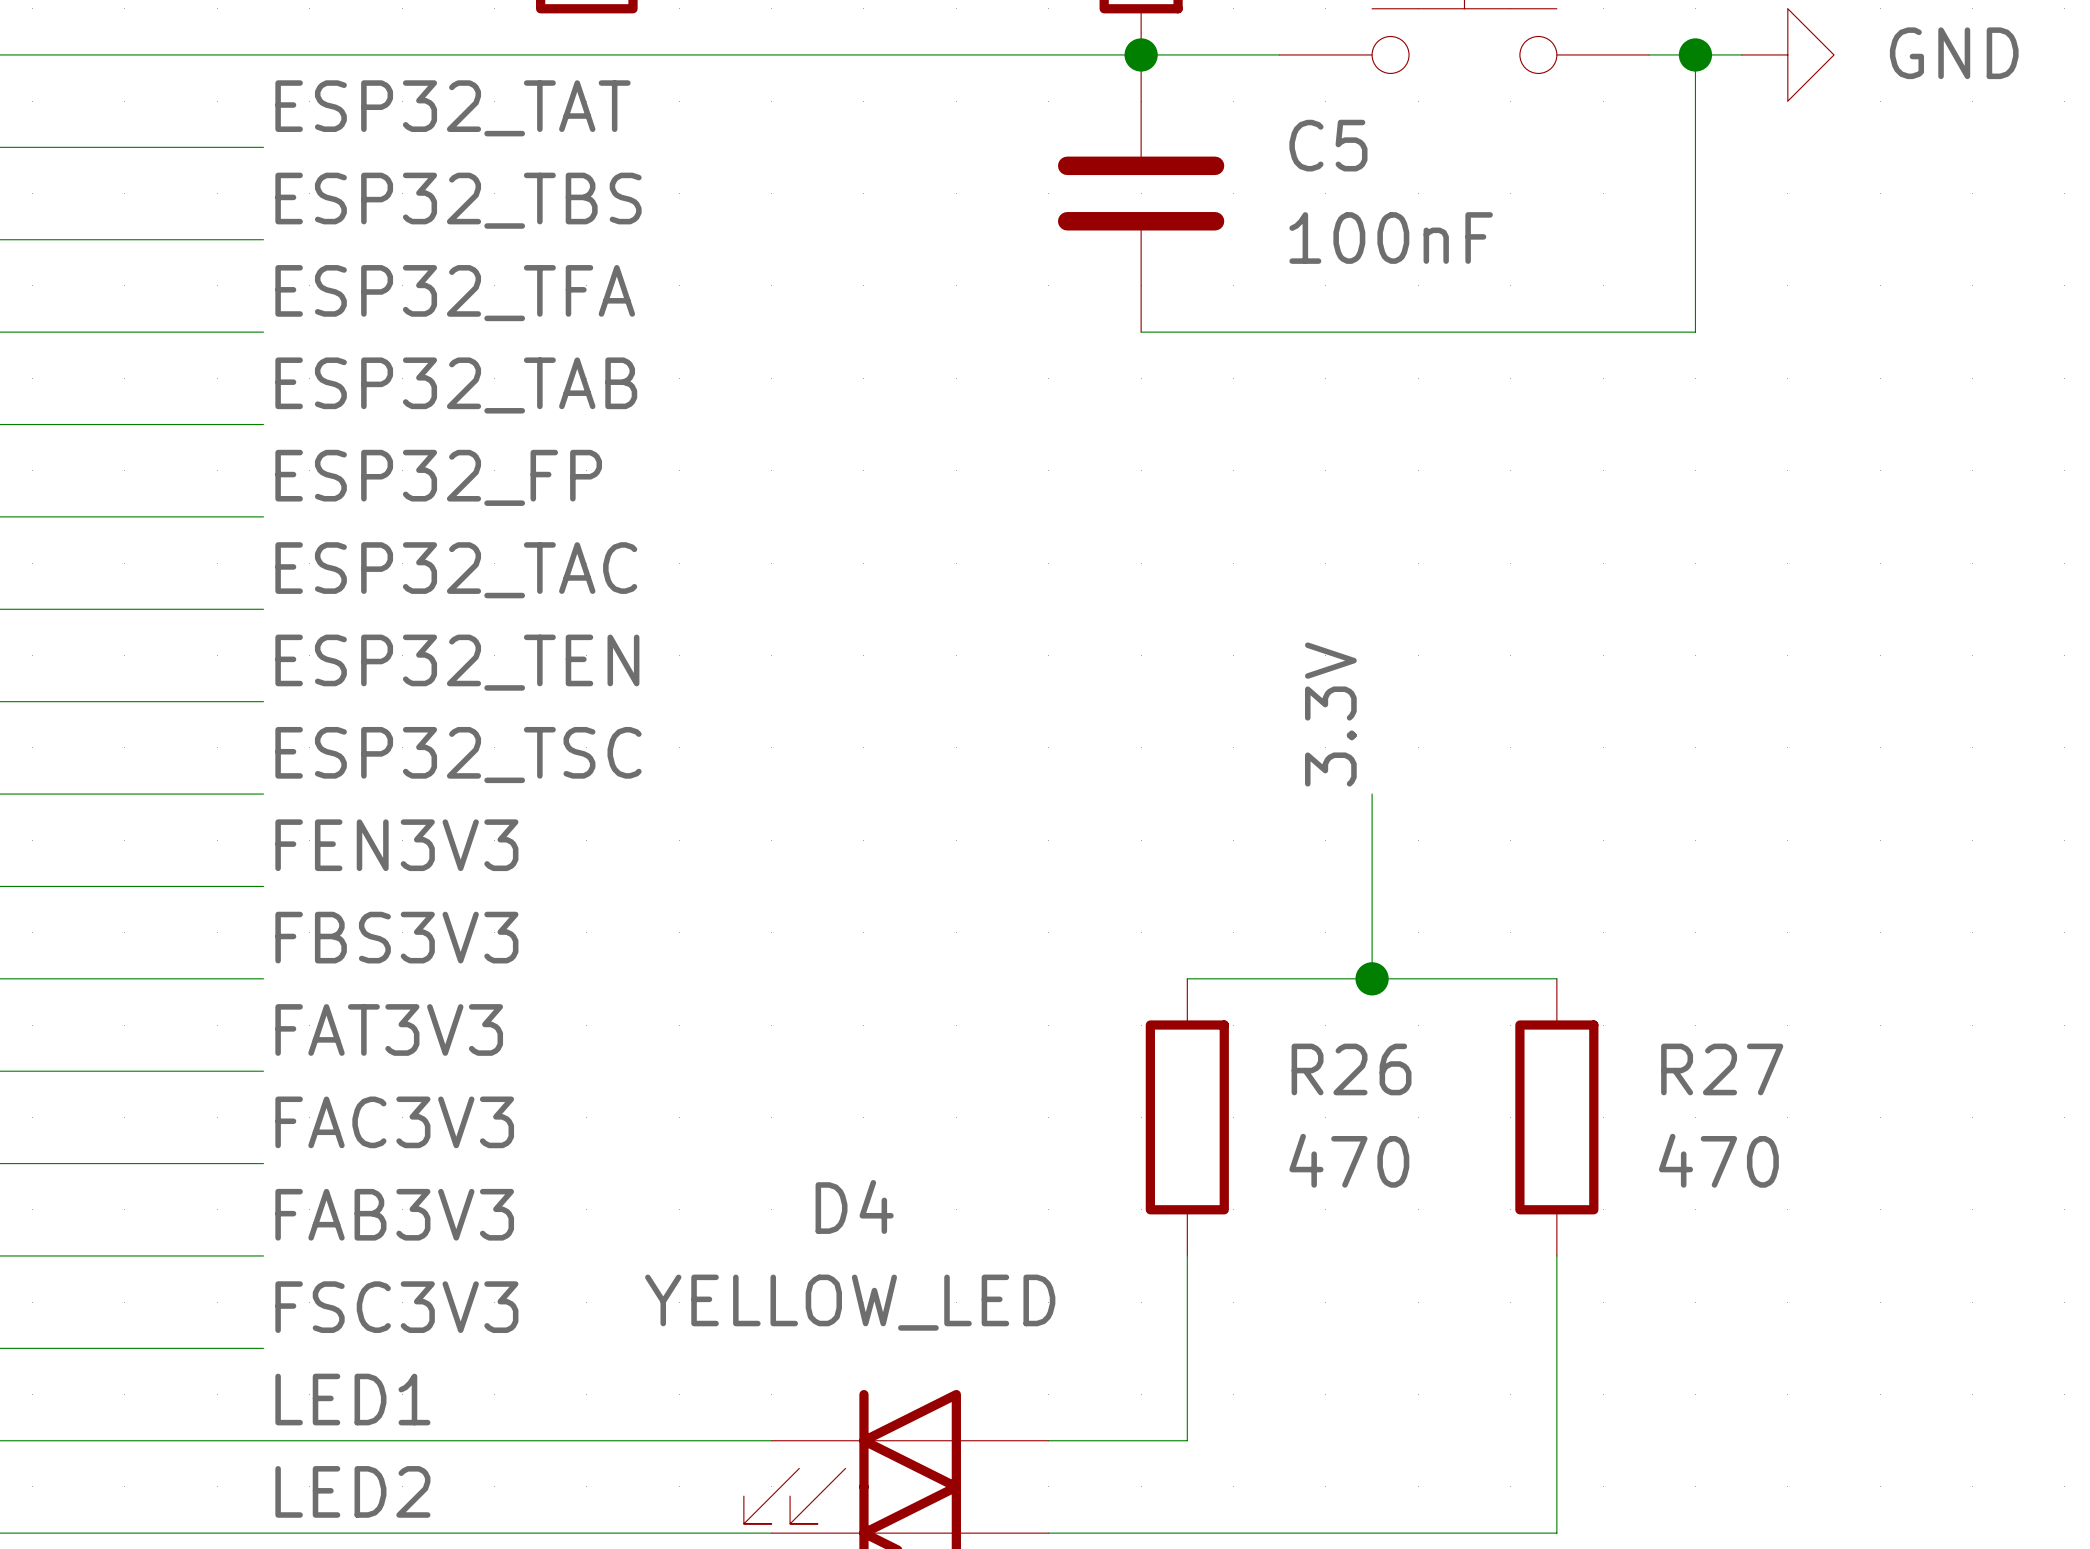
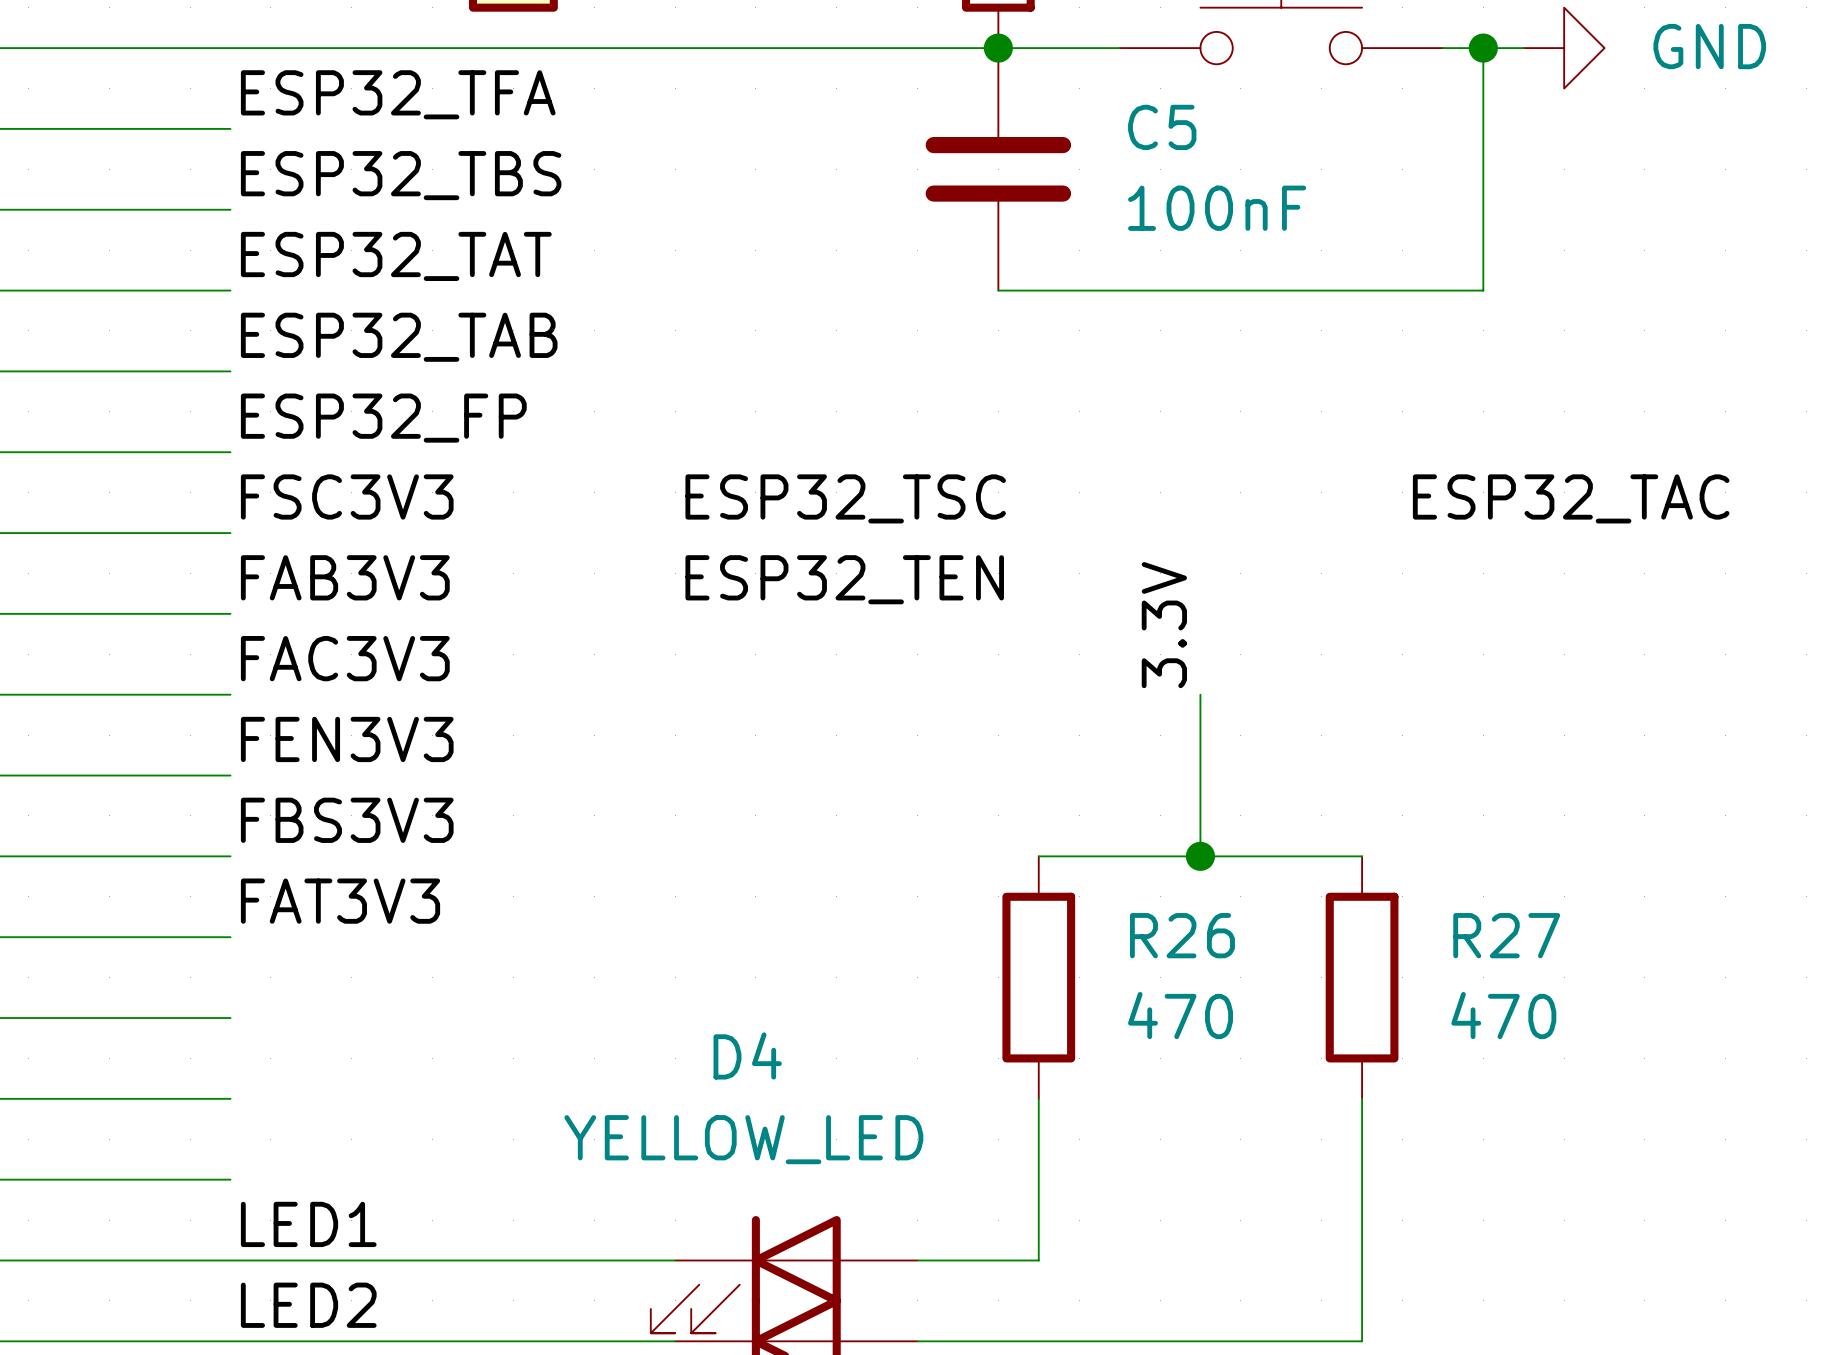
label: ESP32_TAT (452, 108) -> ESP32_TFA (398, 94)
label: ESP32_TFA (455, 293) -> ESP32_TAT (396, 256)
label: ESP32_TAC (456, 570) -> FSC3V3 (347, 496)
label: none -> ESP32_TSC (845, 498)
label: none -> ESP32_TAC (1571, 498)
label: ESP32_TEN (457, 662) -> FAB3V3 (345, 577)
label: none -> ESP32_TEN (844, 579)
label: ESP32_TSC (458, 755) -> FAC3V3 (345, 658)
label: FAC3V3 (394, 1122) -> none
label: FAB3V3 (394, 1214) -> none
label: FSC3V3 (396, 1307) -> none

